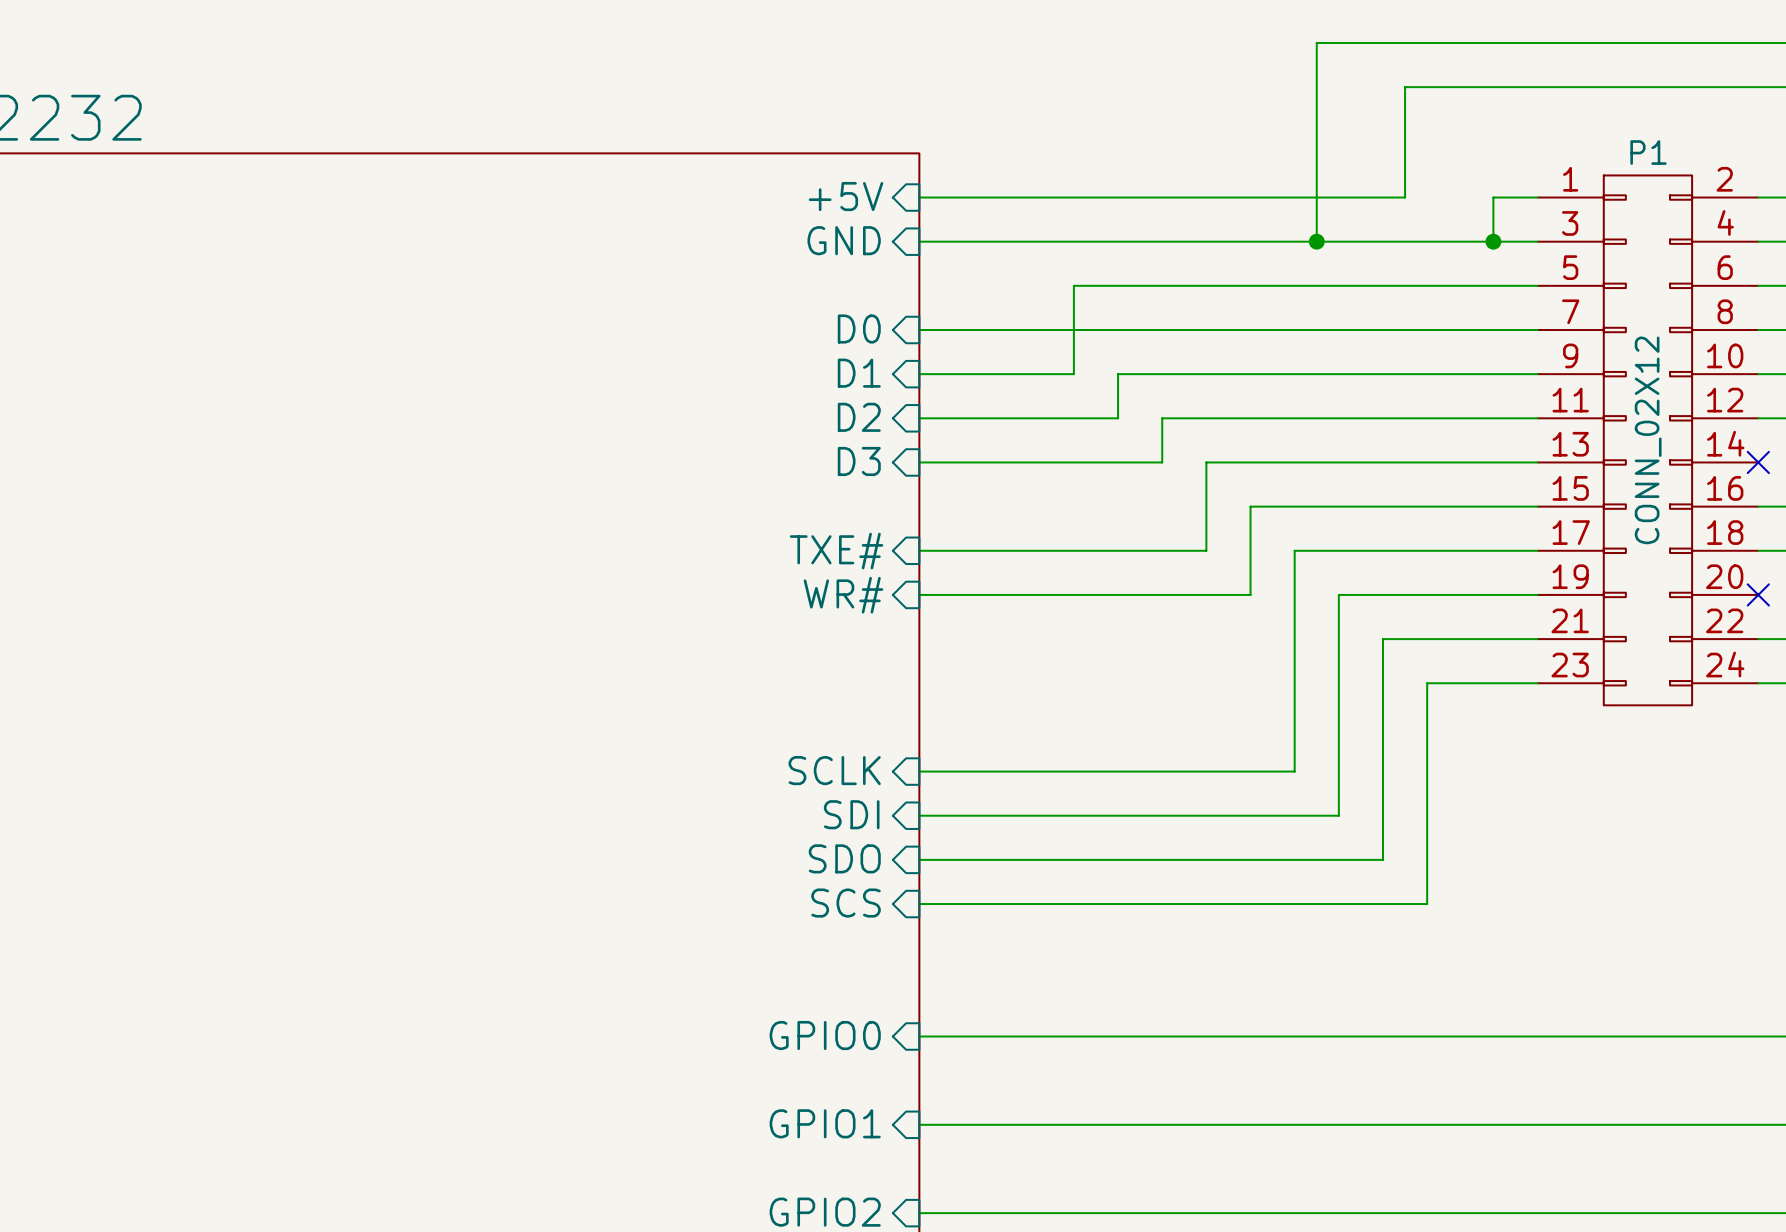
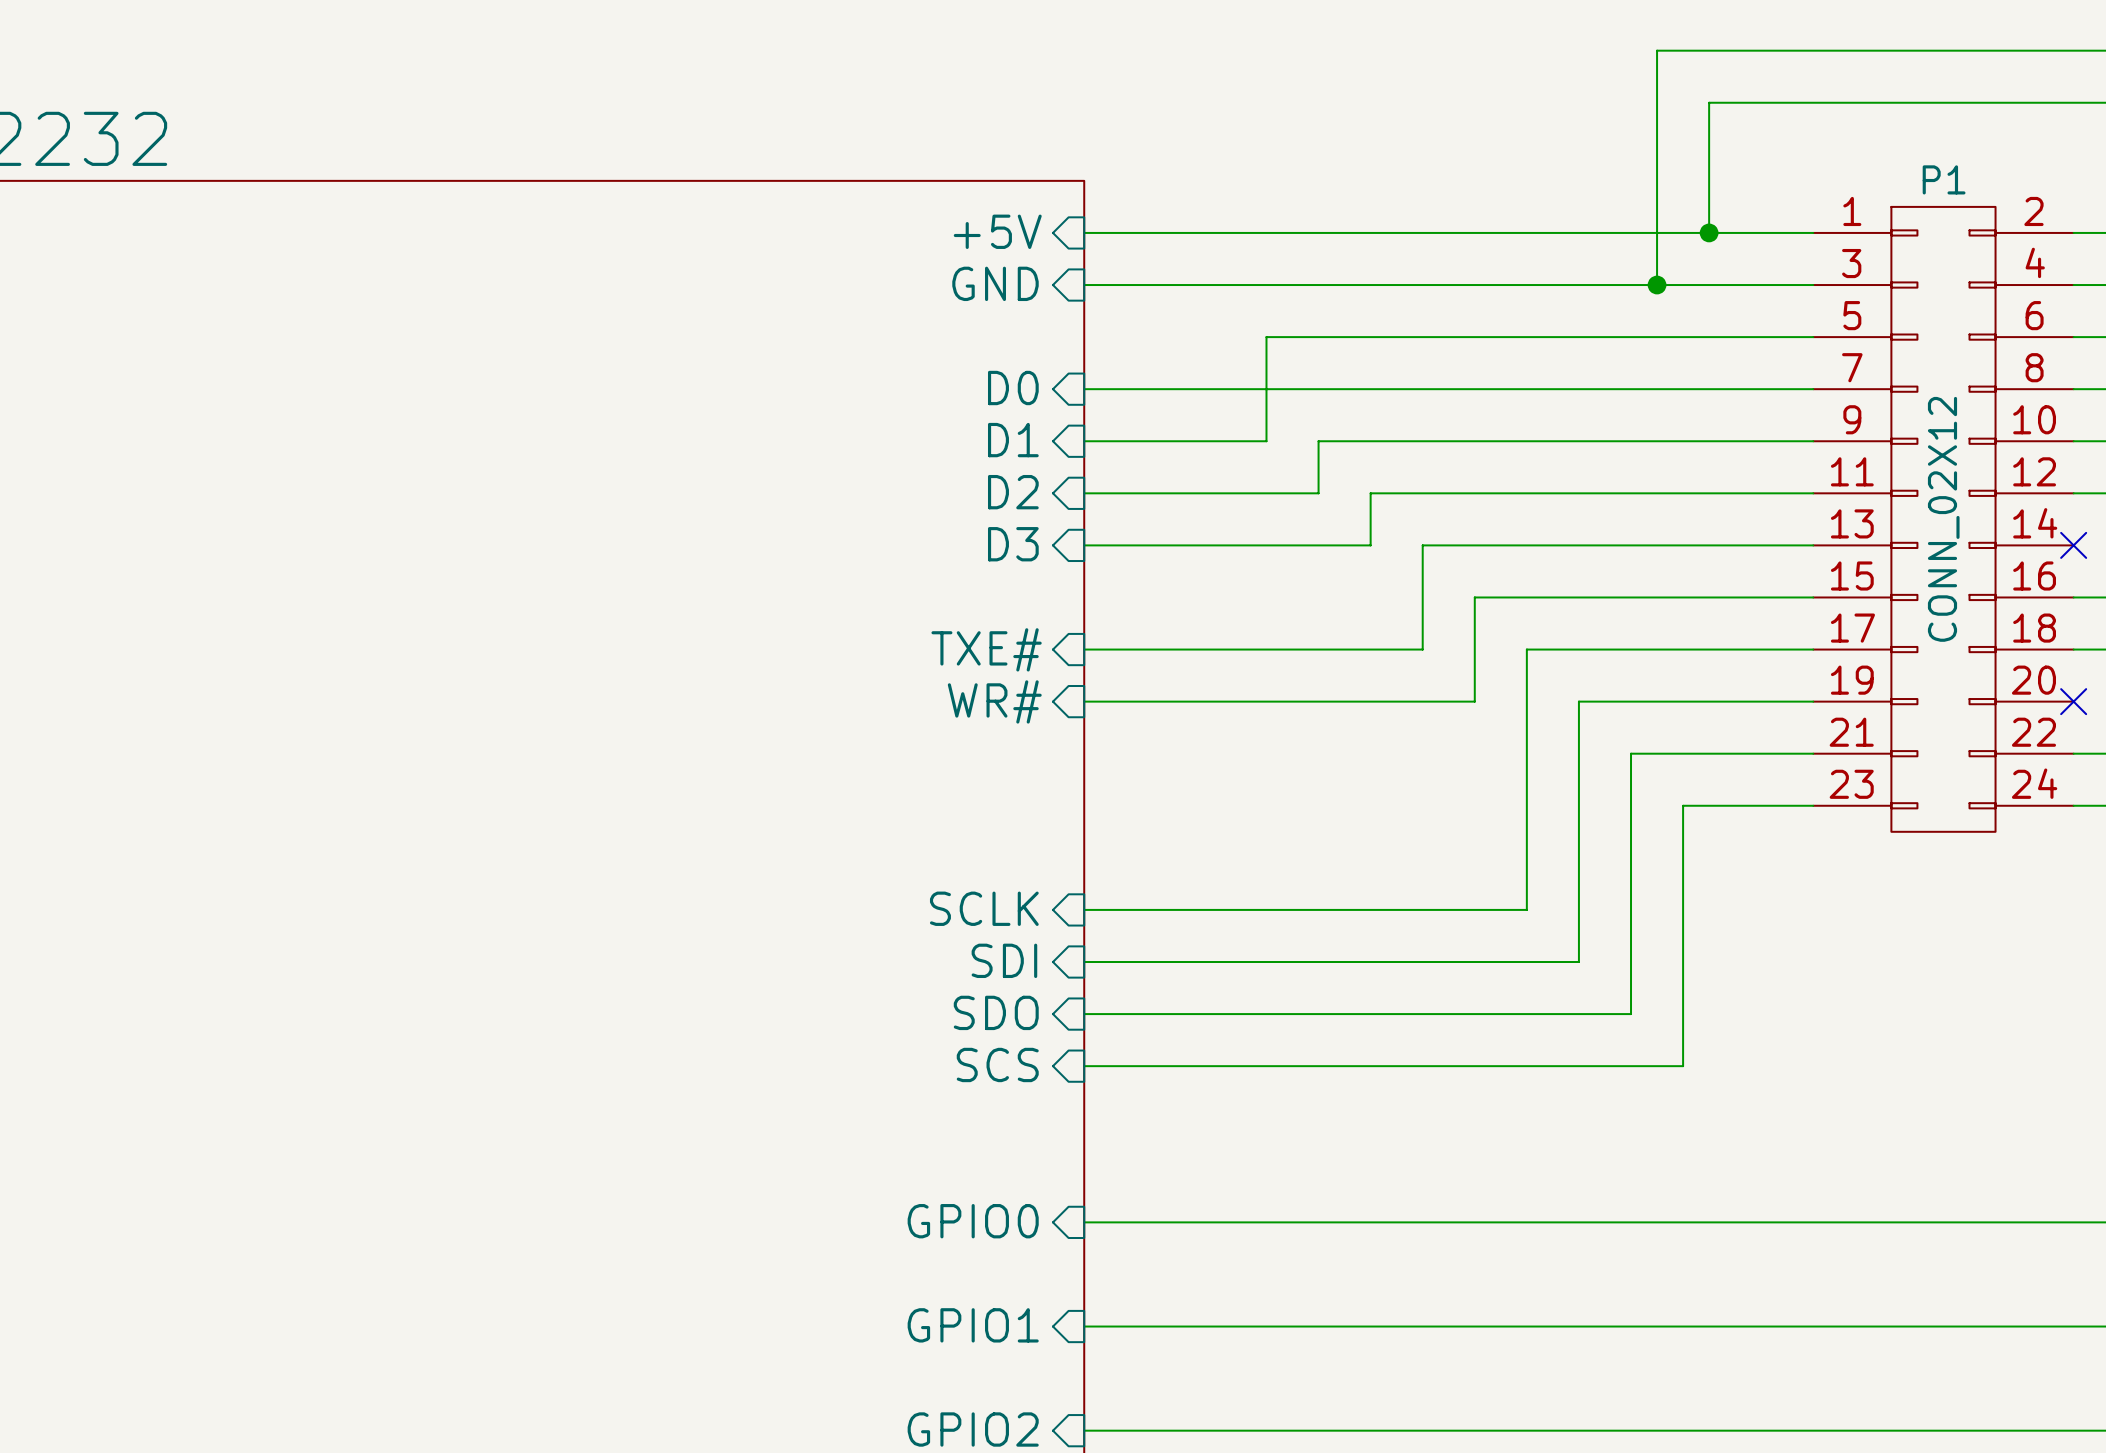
wire: (1405, 42) (1316, 42) (1316, 241) -> none
wire: (1405, 87) (1449, 87) -> (1657, 102) (1657, 50)
wire: none -> (1709, 102) (1709, 232)
junction: none -> (1709, 232)
wire: (1493, 197) (1493, 241) -> (1761, 232) (1657, 232) (1657, 285)
junction: (1316, 241) -> none
junction: none -> (1657, 285)
junction: (1493, 241) -> none

